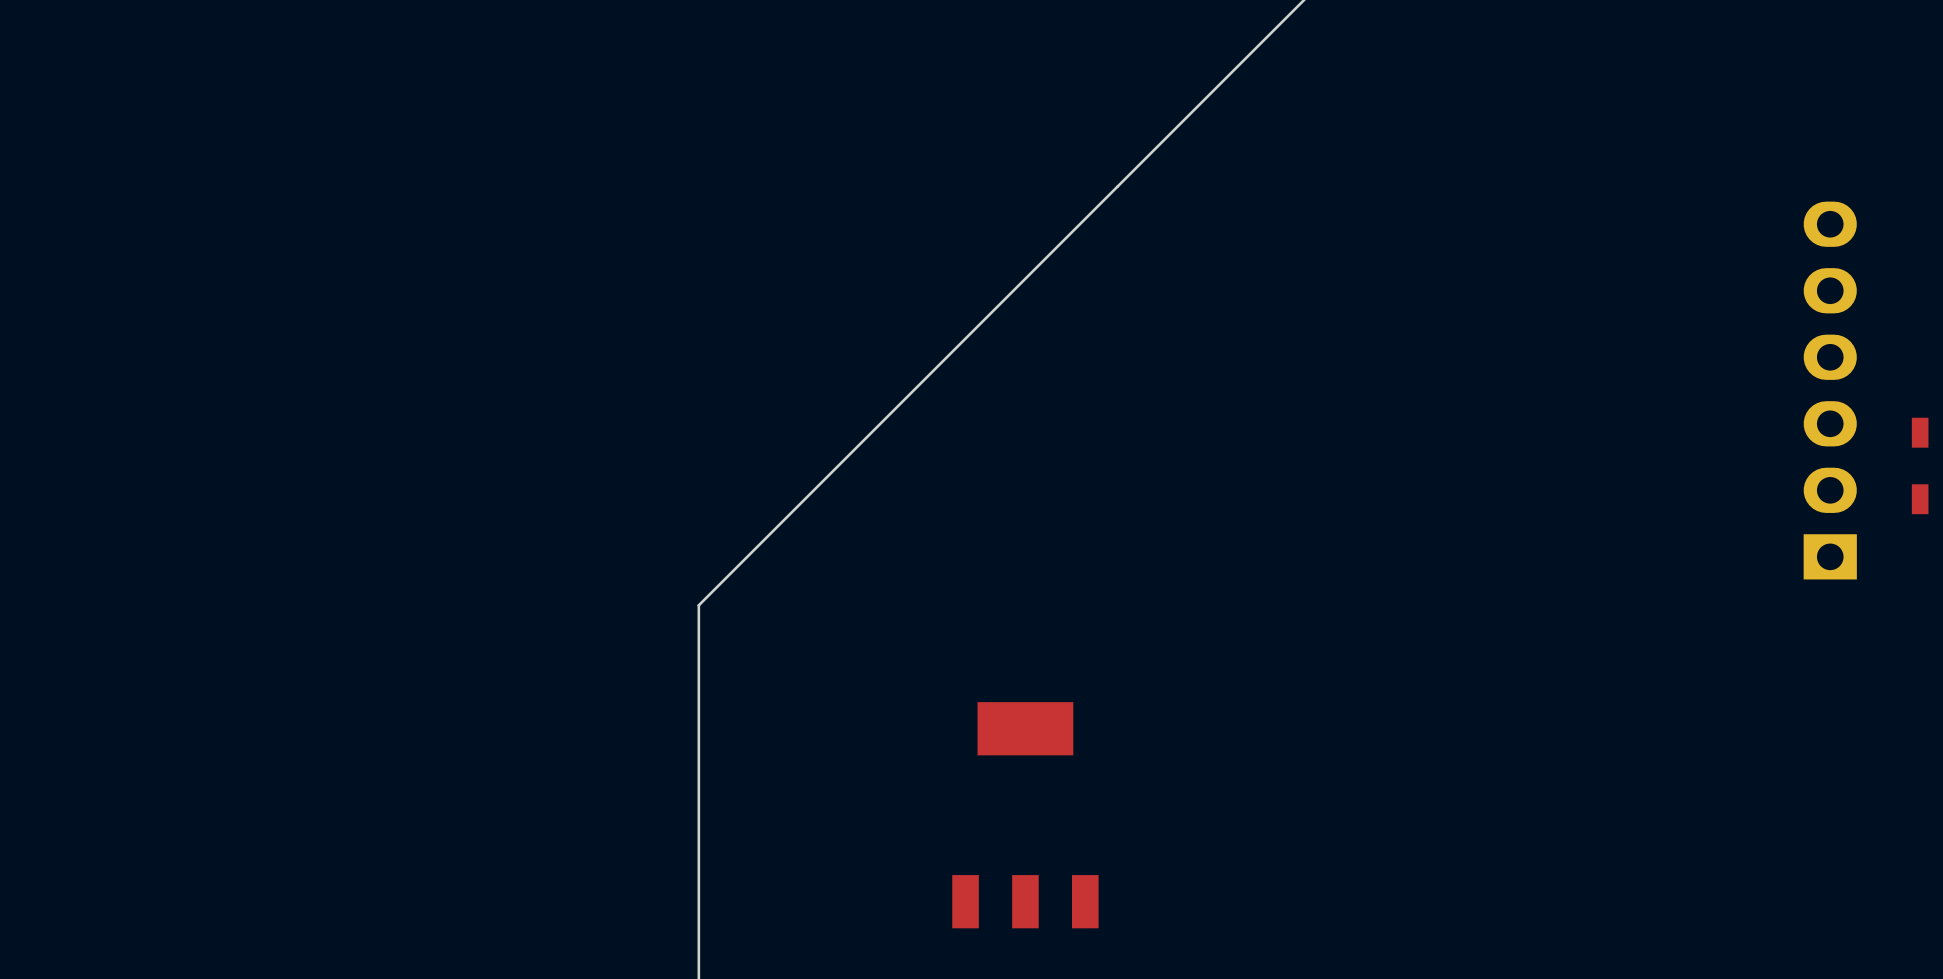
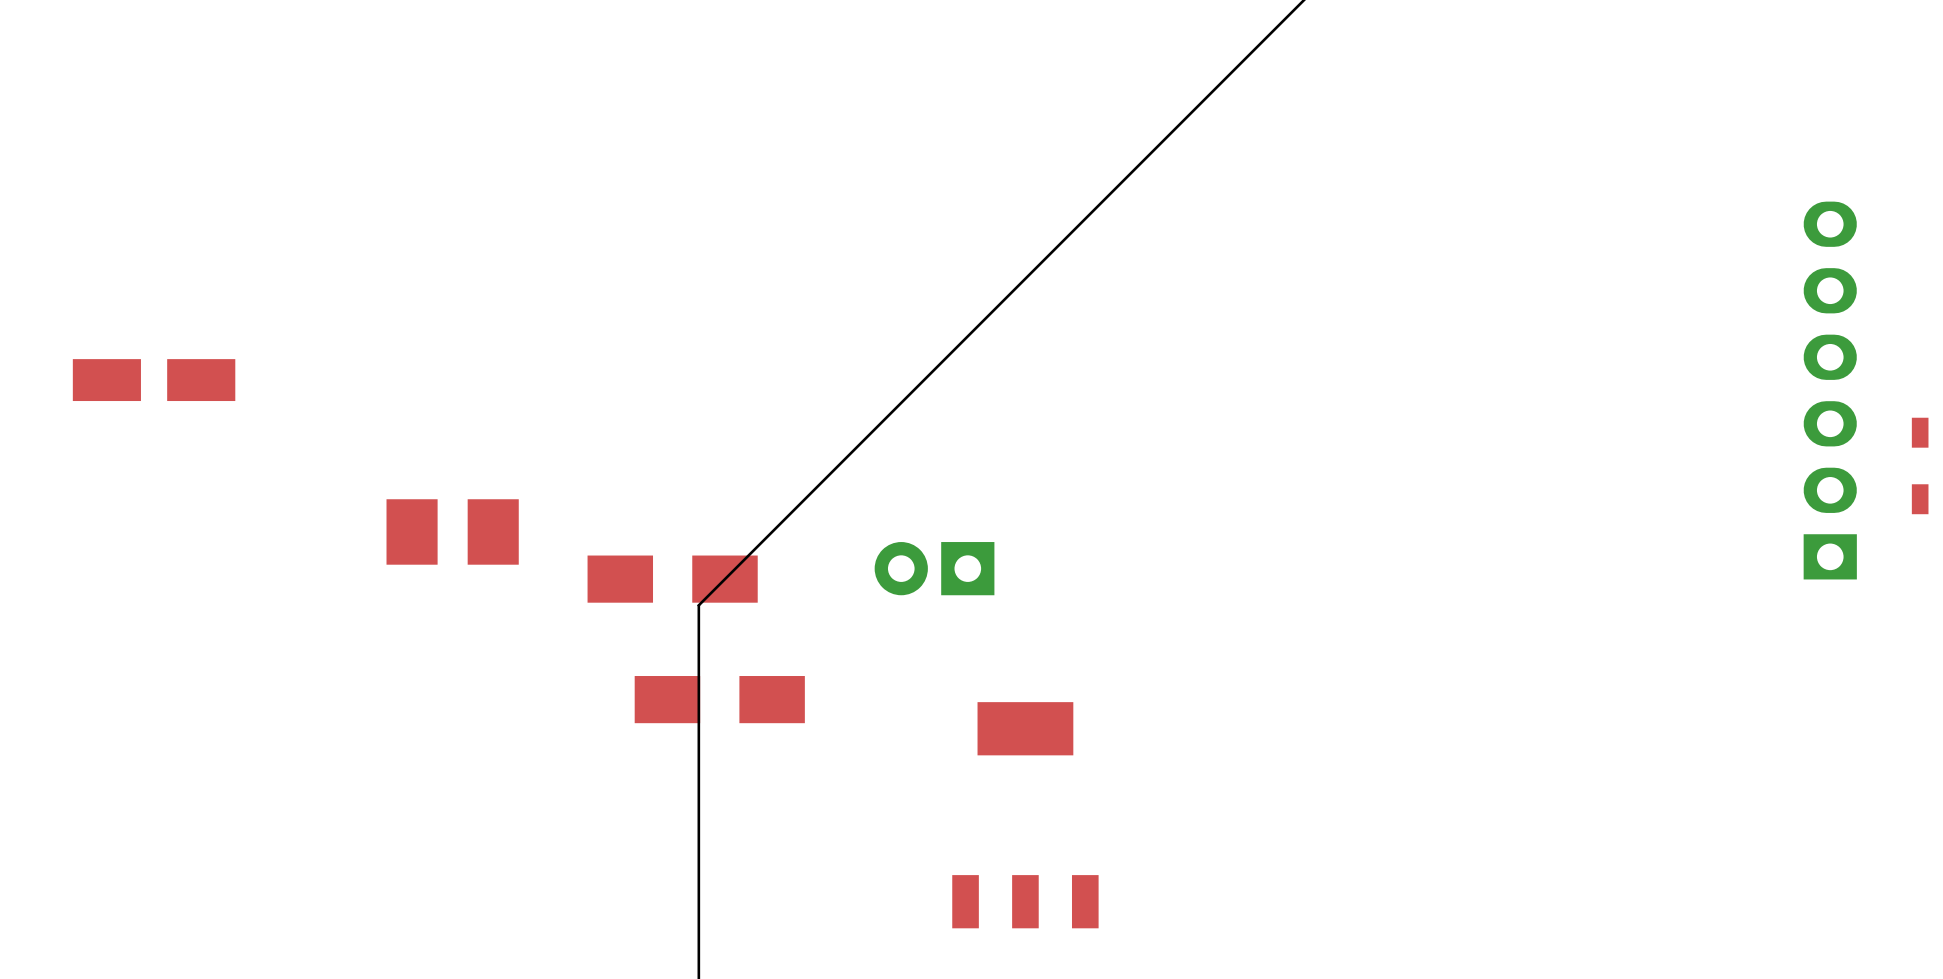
part: none -> (154, 380)
part: none -> (452, 531)
part: none -> (934, 568)
part: none -> (672, 579)
part: none -> (719, 699)

